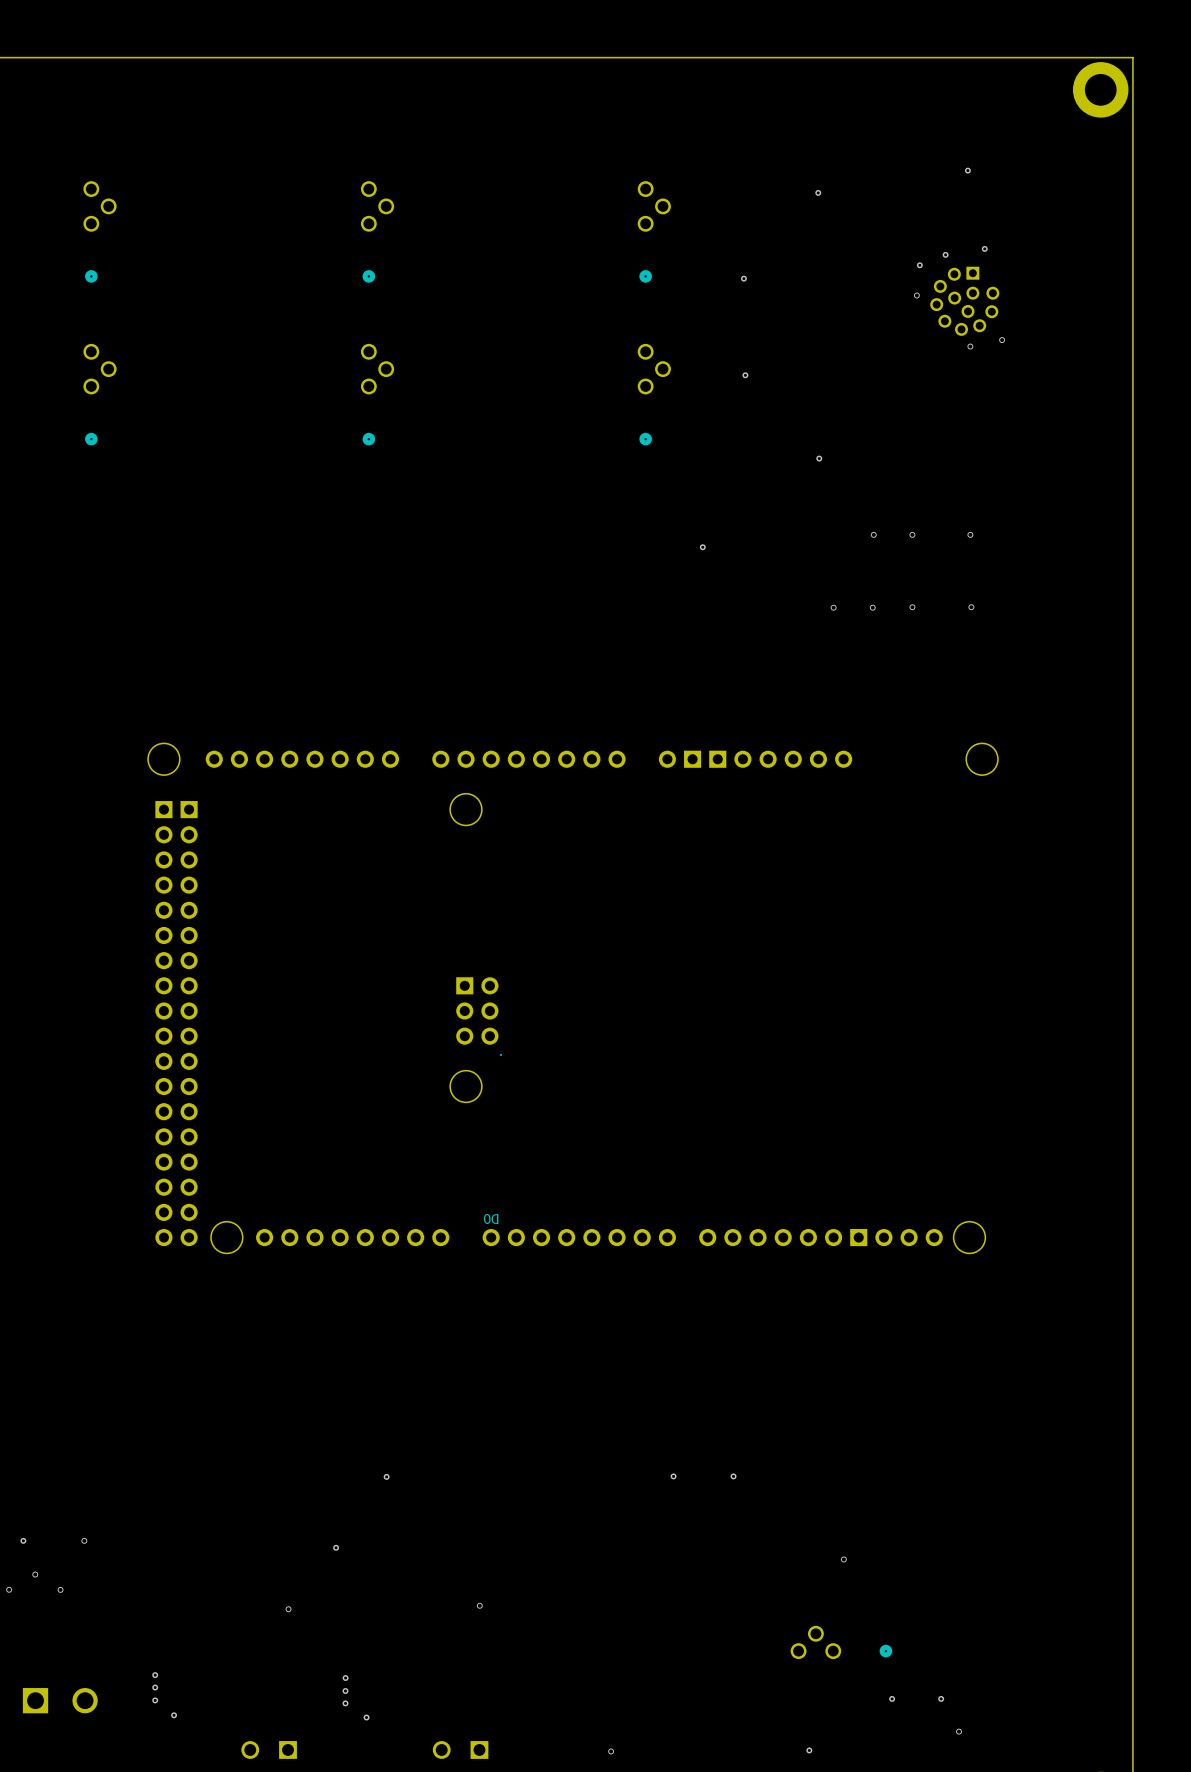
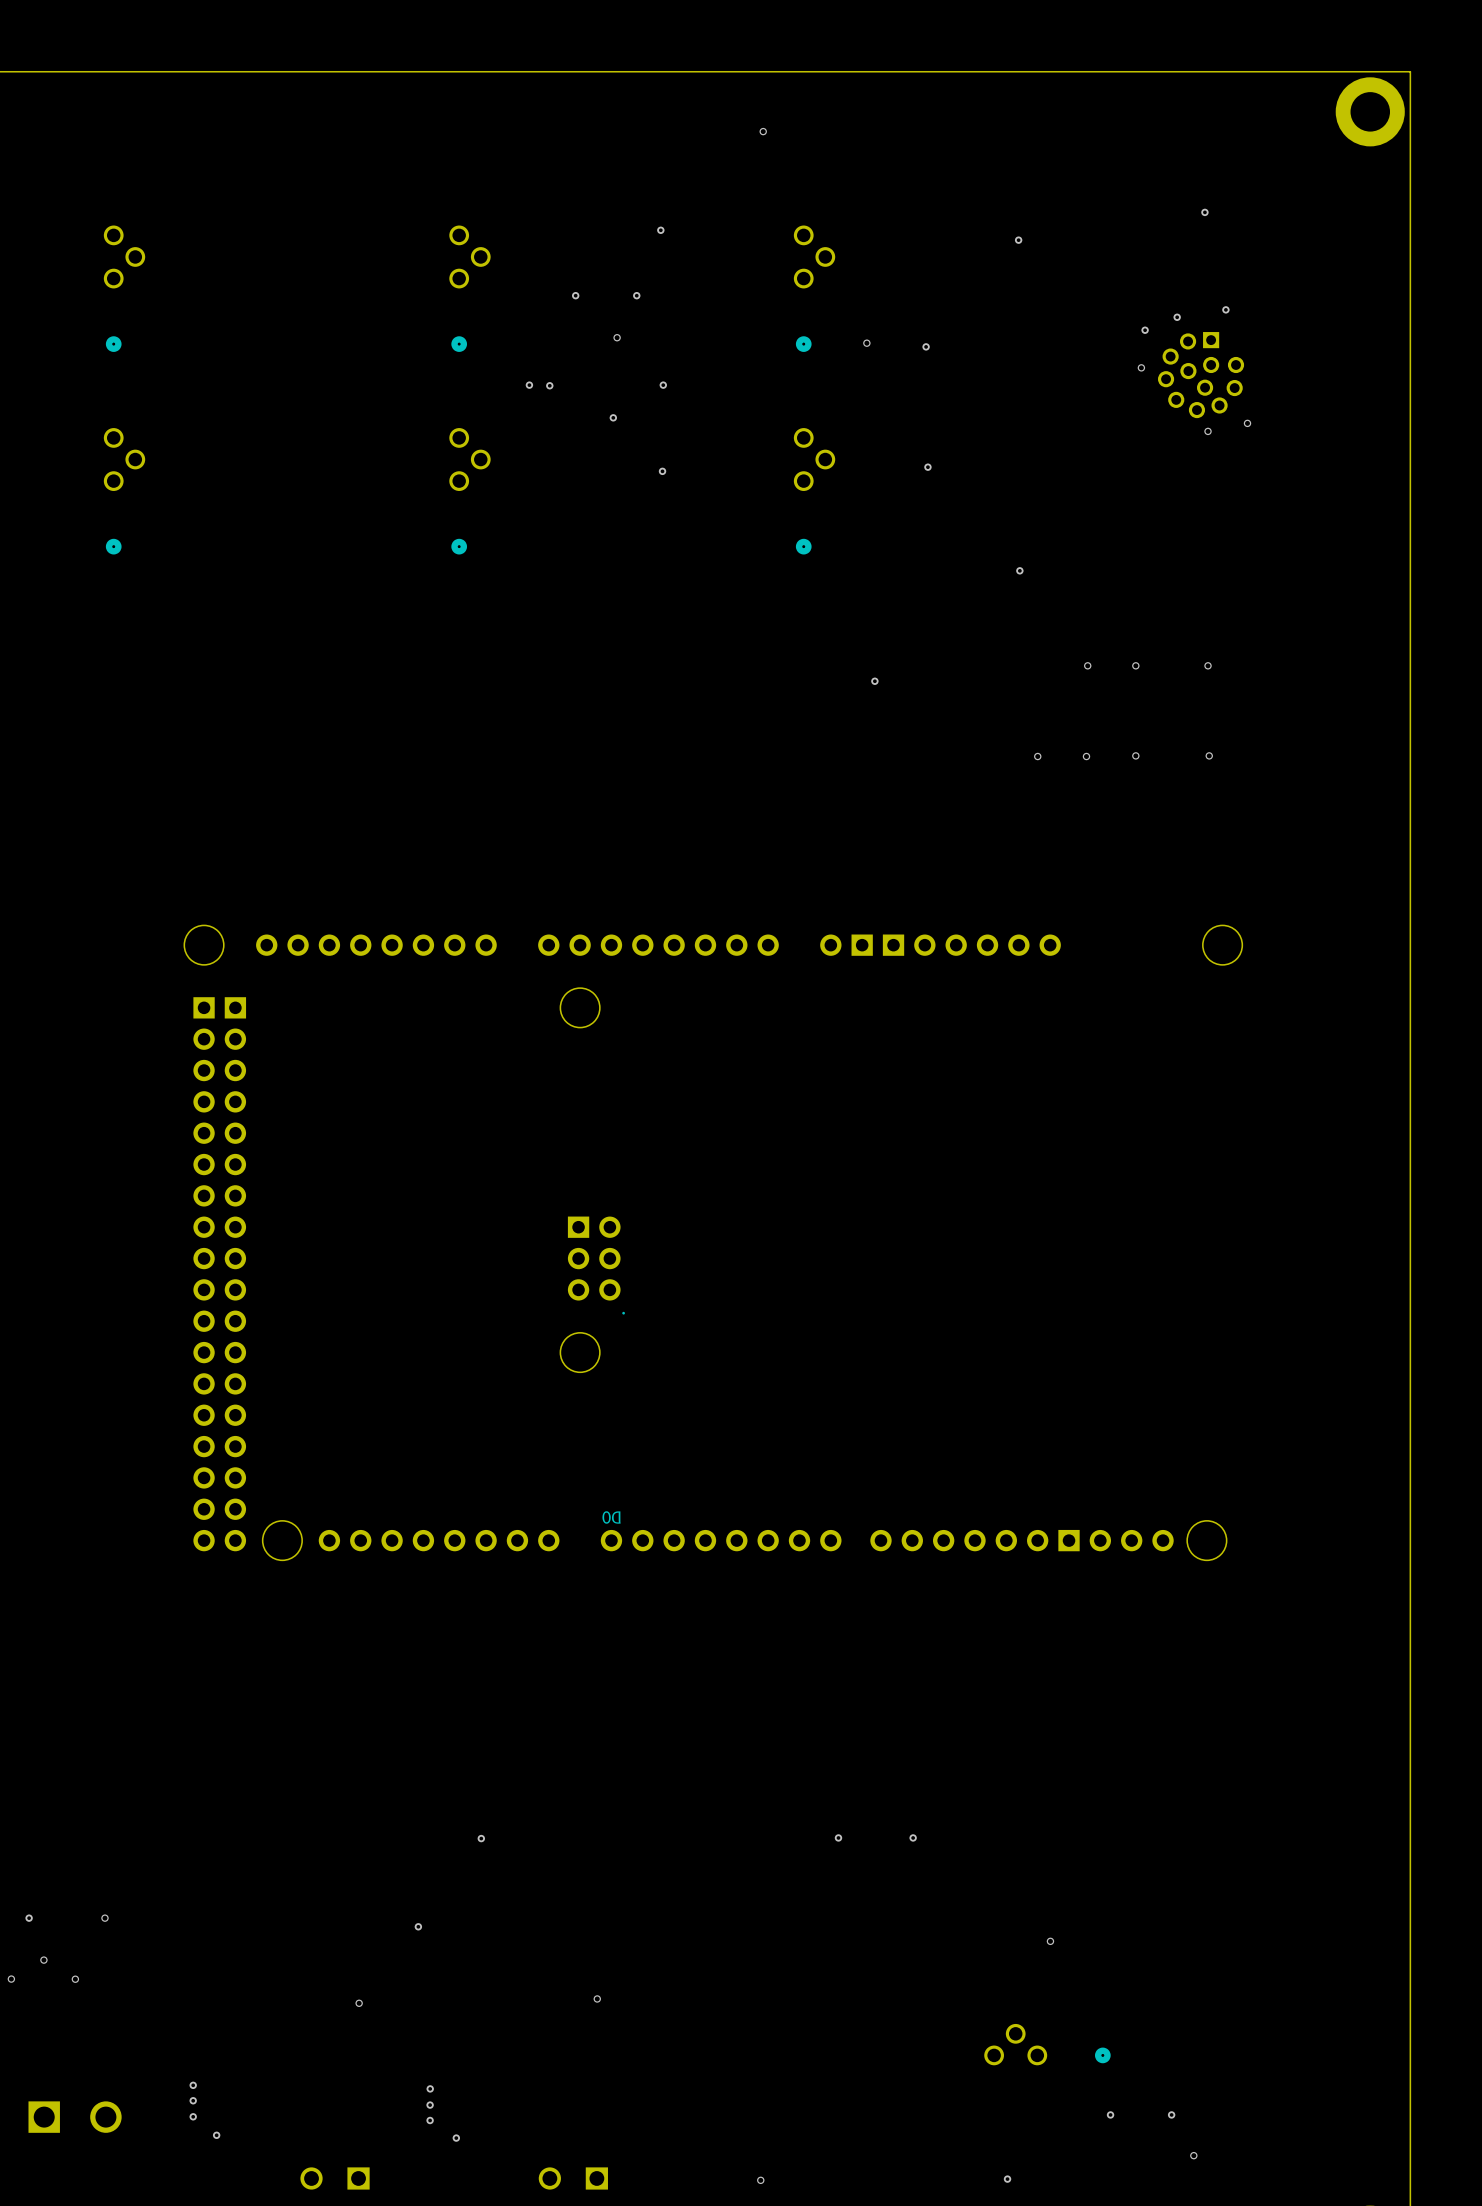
via: none -> (763, 131)
via: none -> (660, 230)
via: none -> (575, 295)
via: none -> (636, 295)
via: none -> (617, 337)
via: none -> (866, 343)
via: none -> (529, 385)
via: none -> (549, 385)
via: none -> (663, 385)
via: none -> (613, 417)
via: none -> (662, 471)

